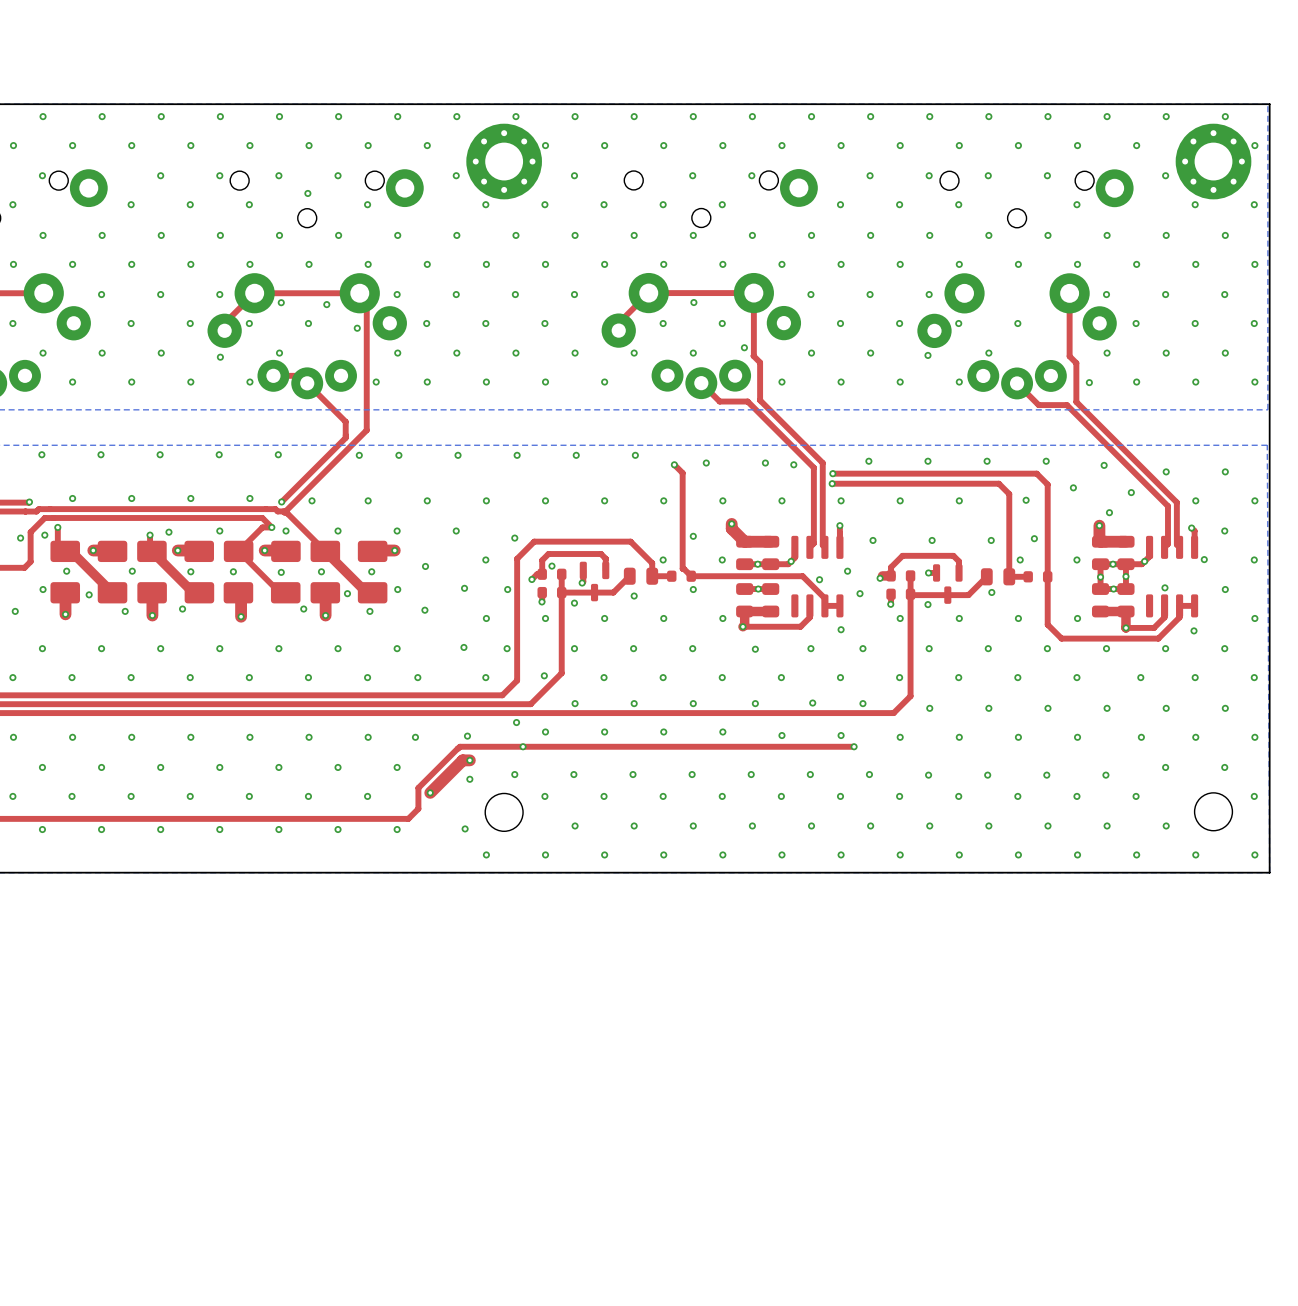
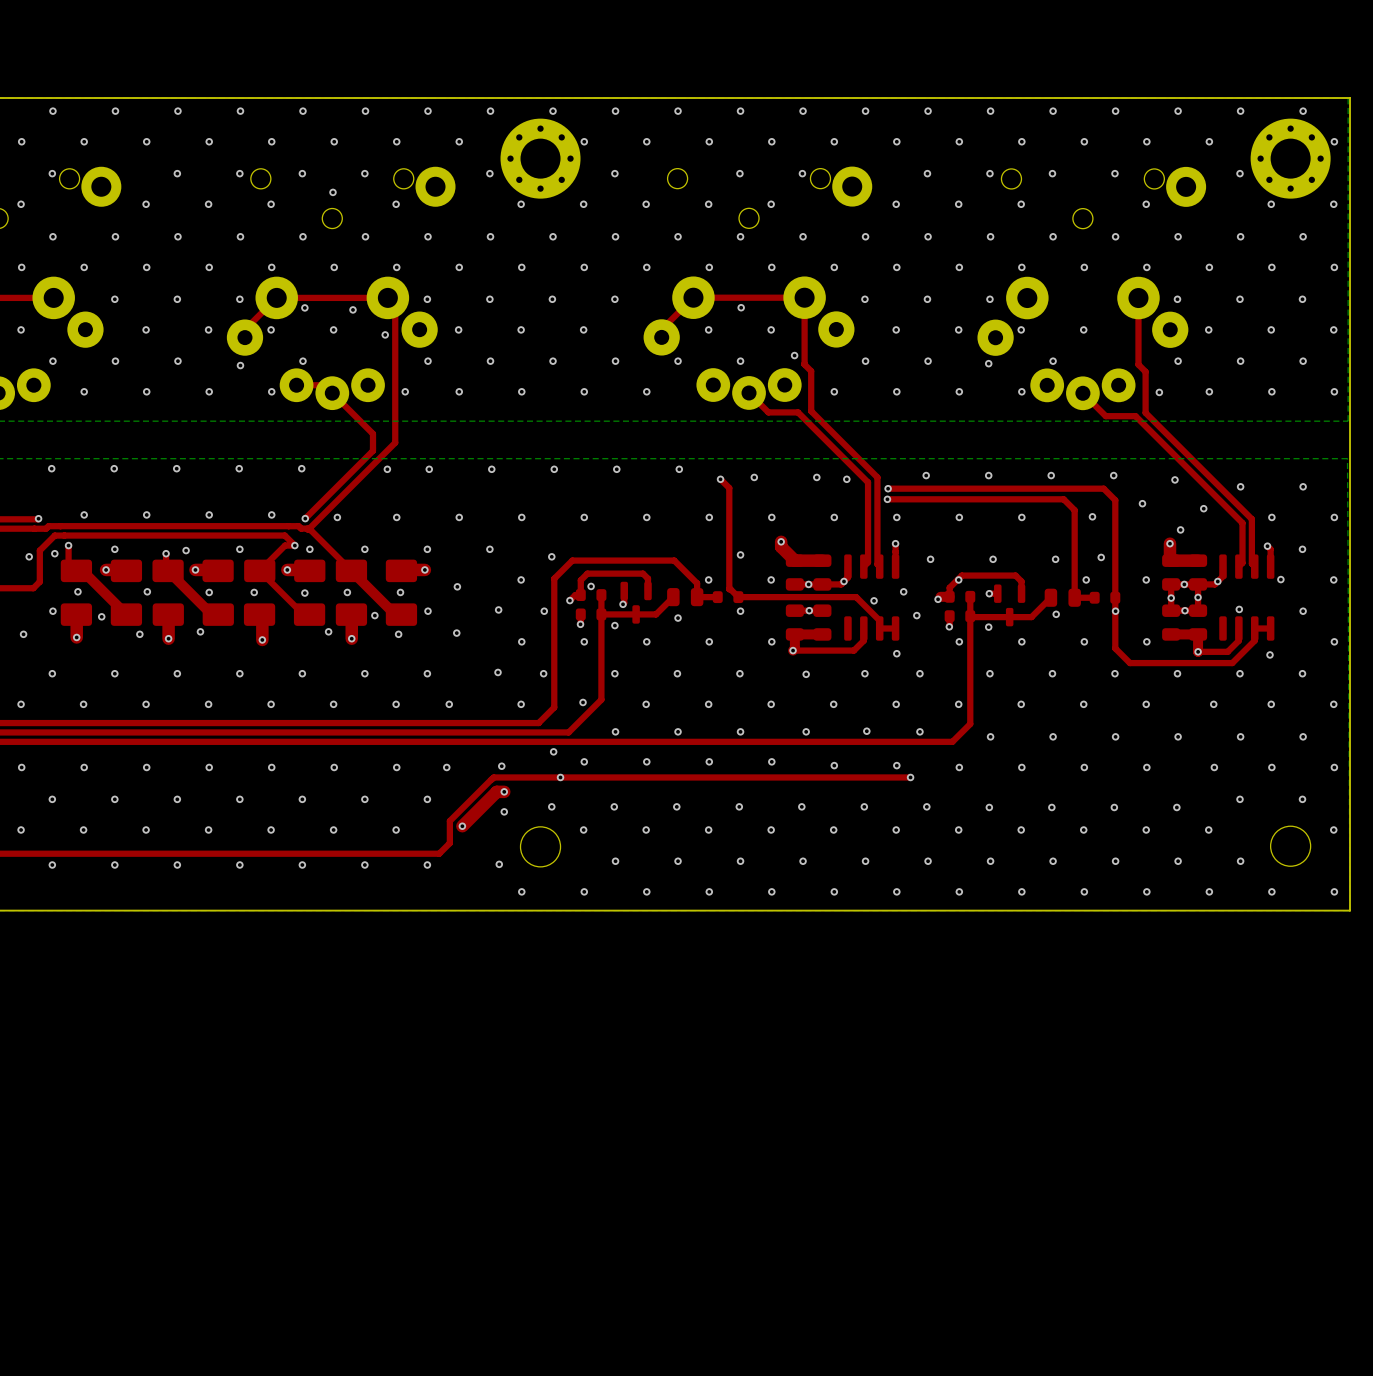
via: none -> (114, 549)
via: none -> (958, 579)
via: none -> (1115, 611)

